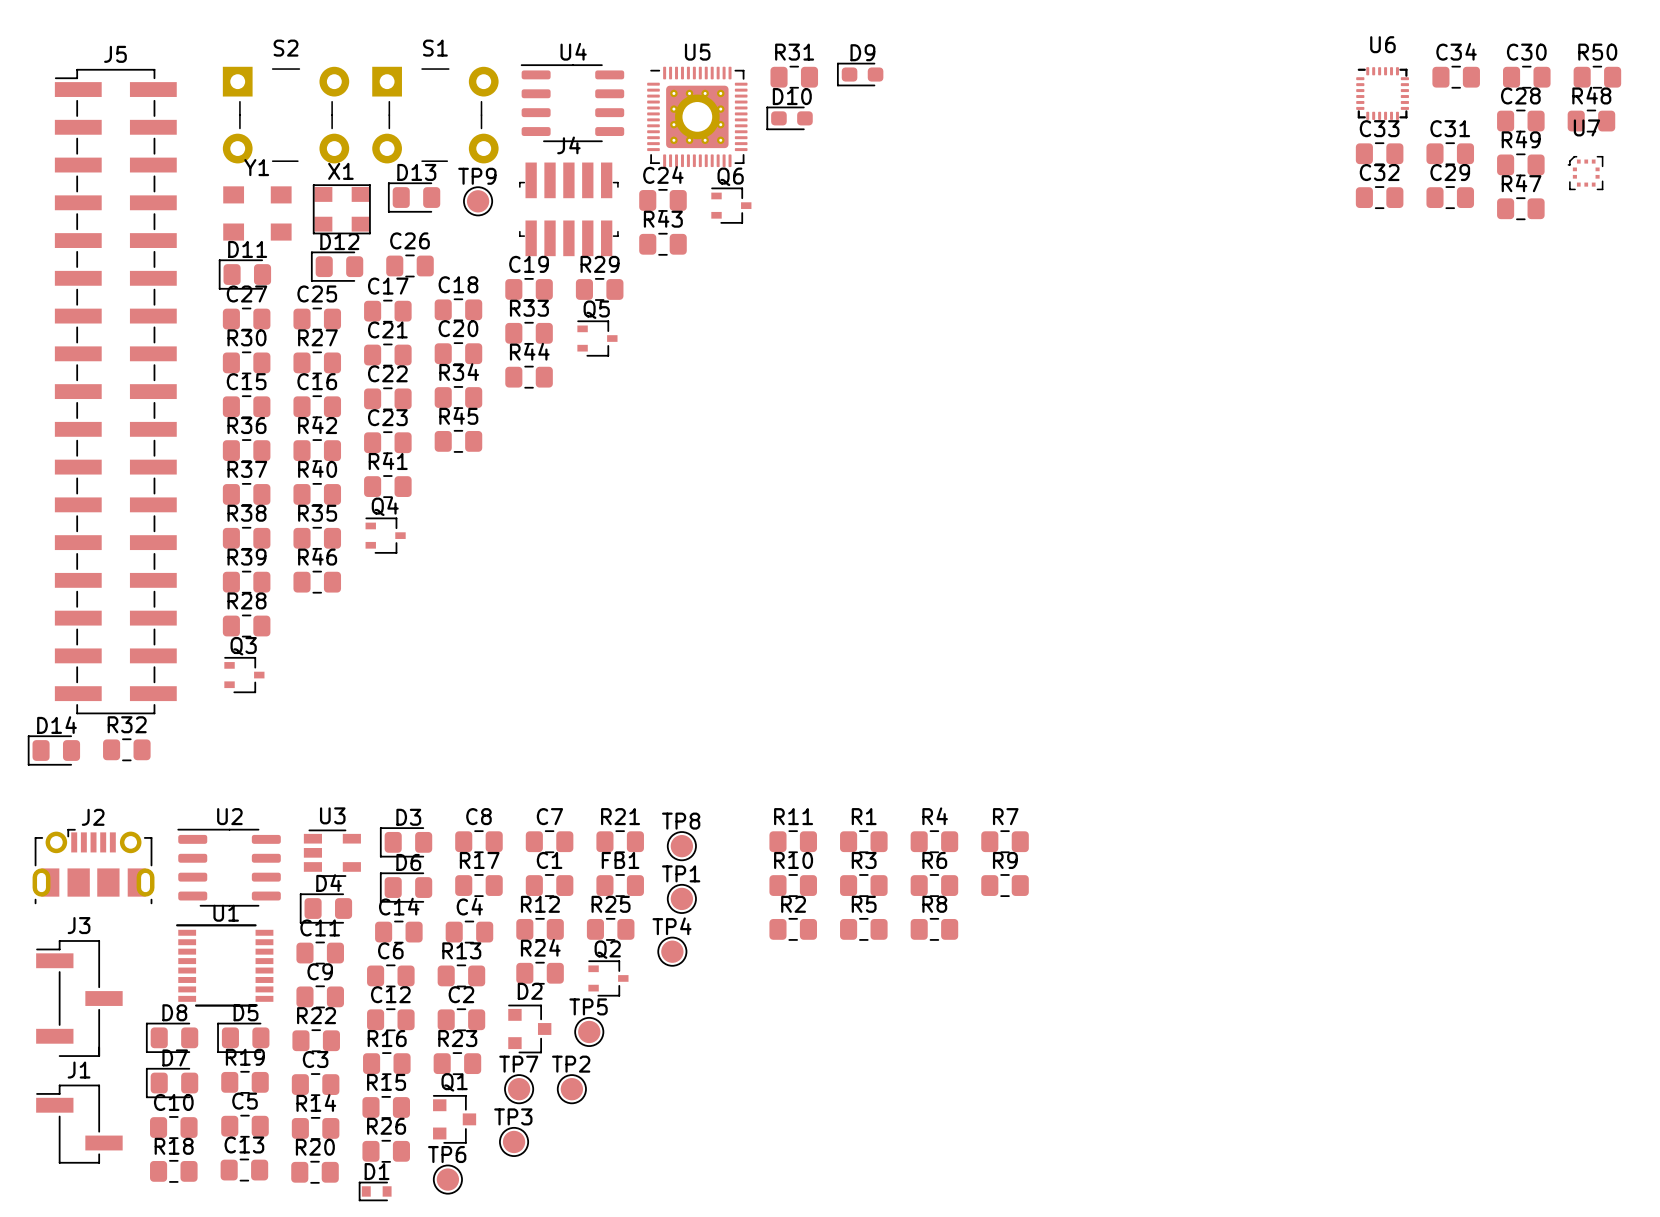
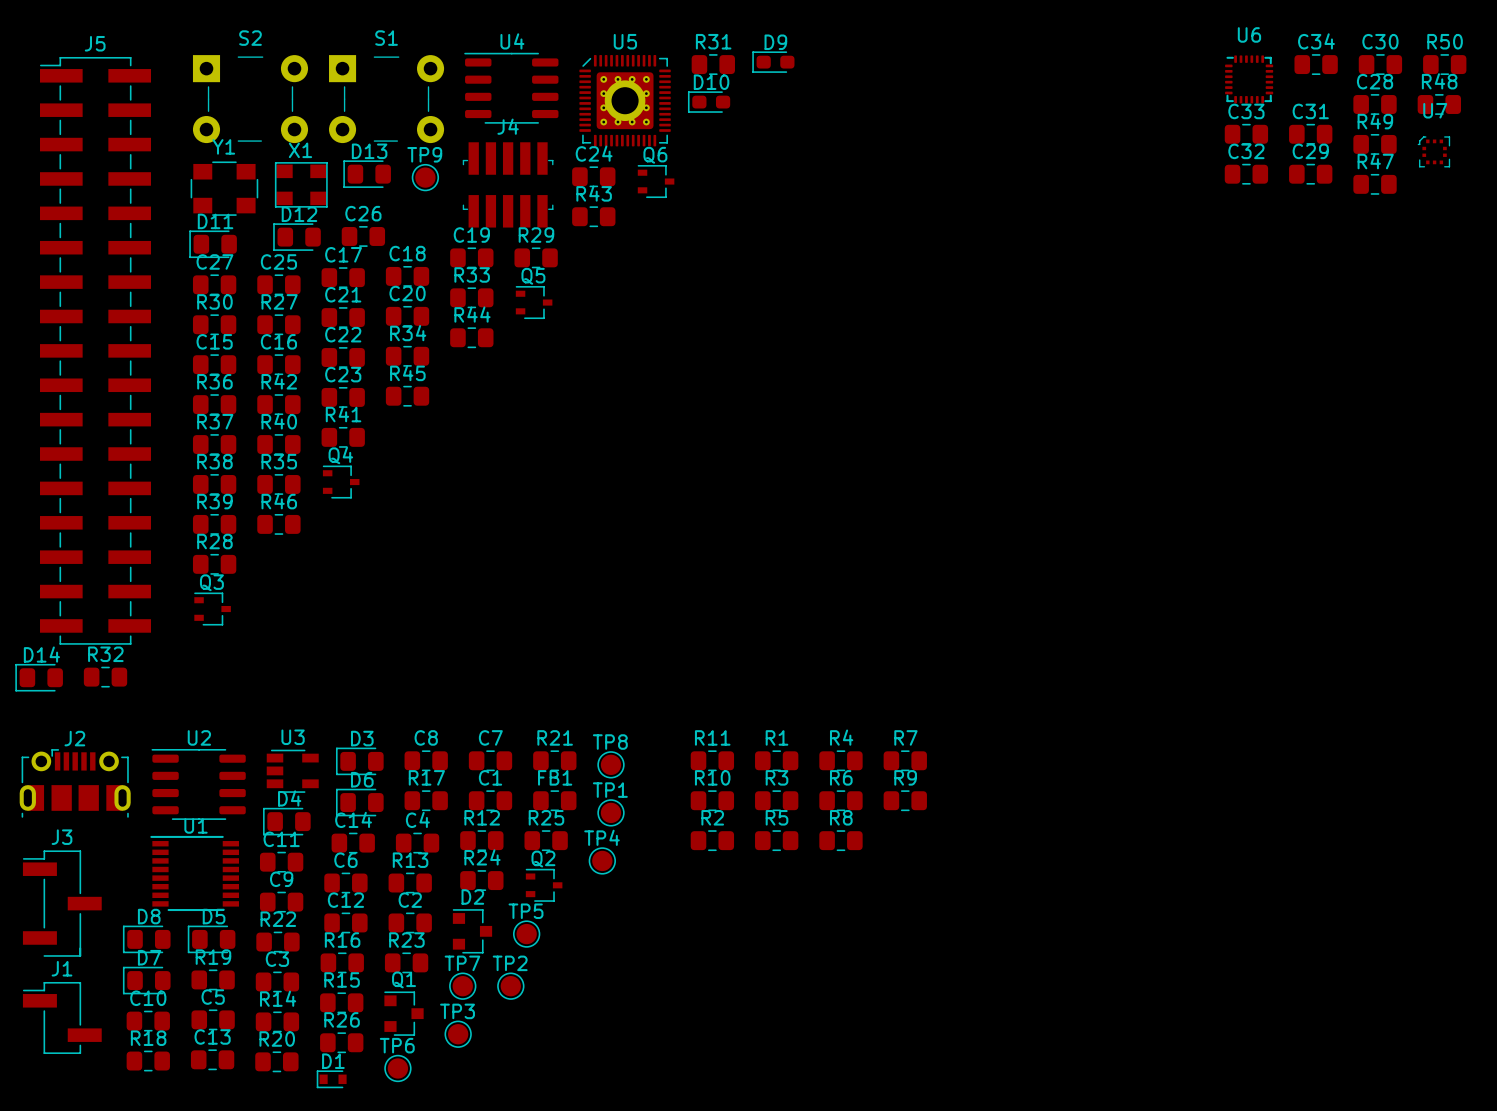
U5 footprint: [647, 66, 748, 168] -> [579, 55, 671, 147]
Y1 footprint: [223, 186, 292, 241] -> [190, 161, 259, 216]

